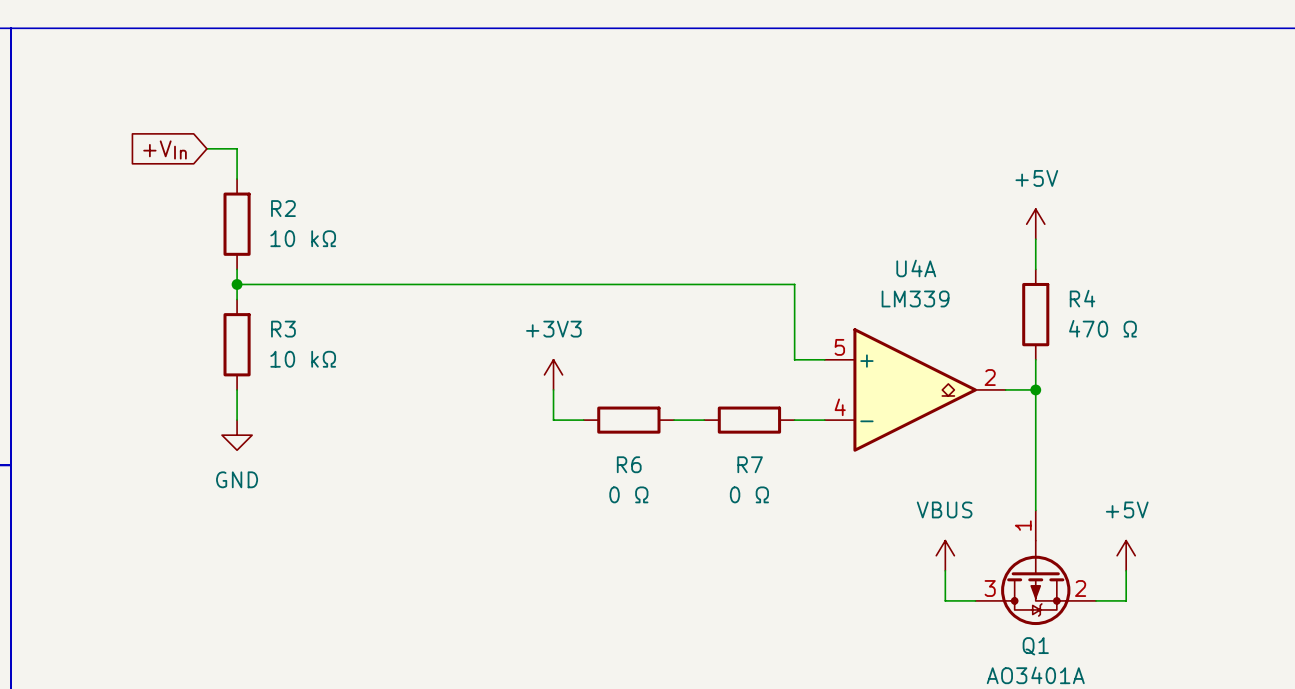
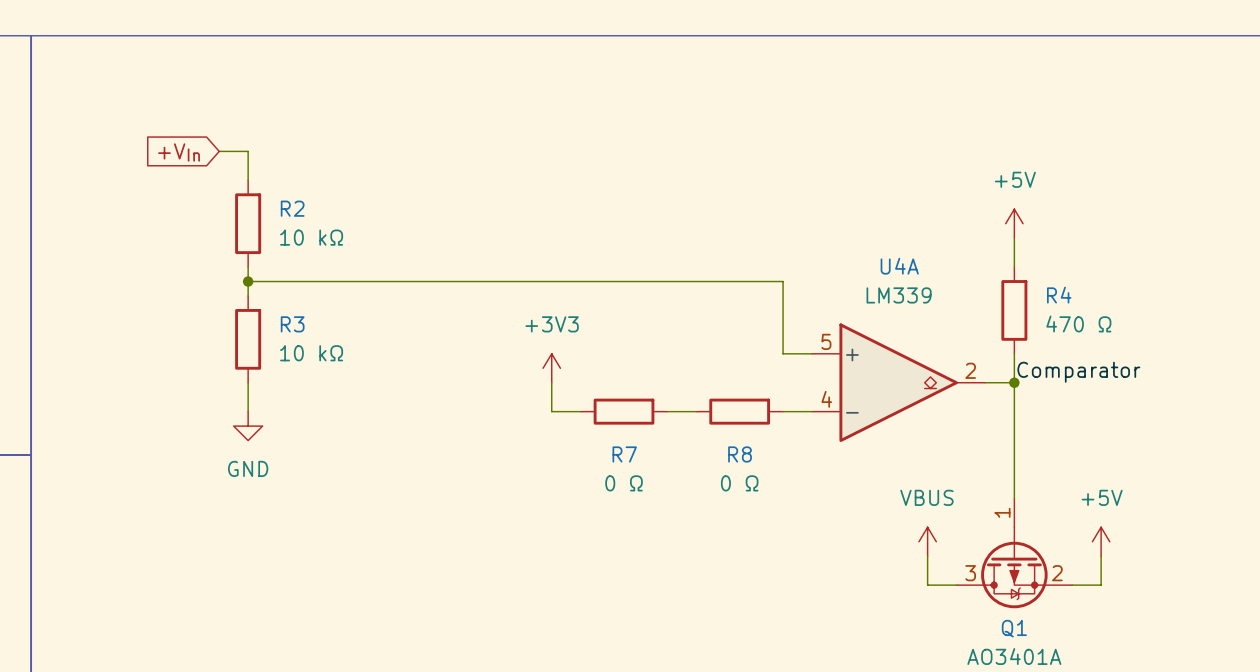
label: none -> Comparator (1078, 372)
R6 name: R6 (629, 464) -> R7 (624, 454)
R7 name: R7 (750, 464) -> R8 (740, 454)

